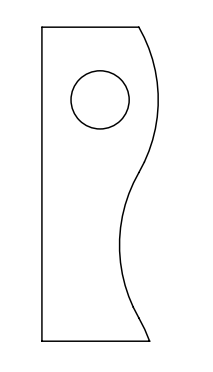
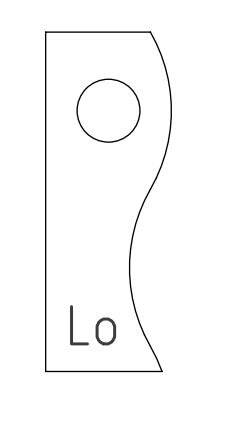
text: none -> Lo (93, 325)

